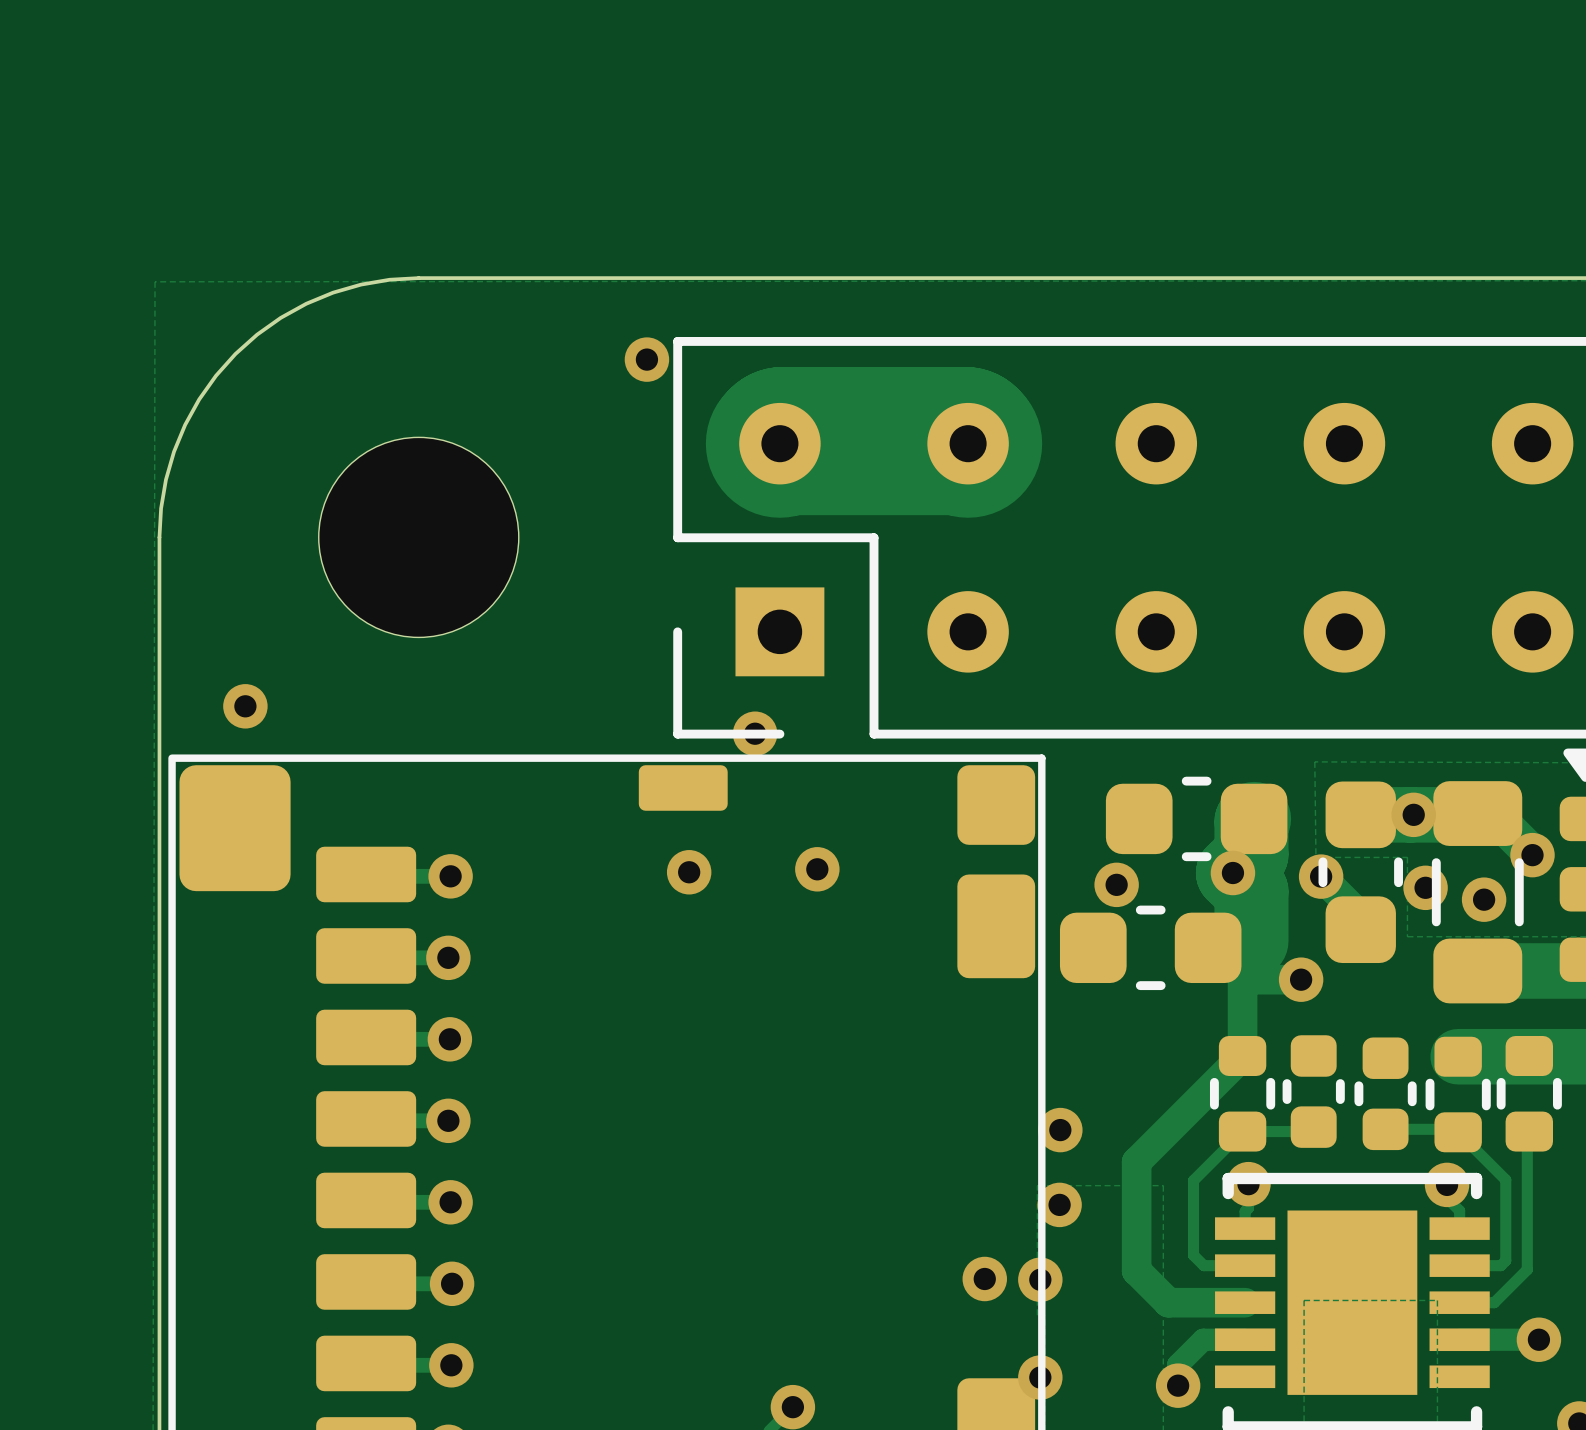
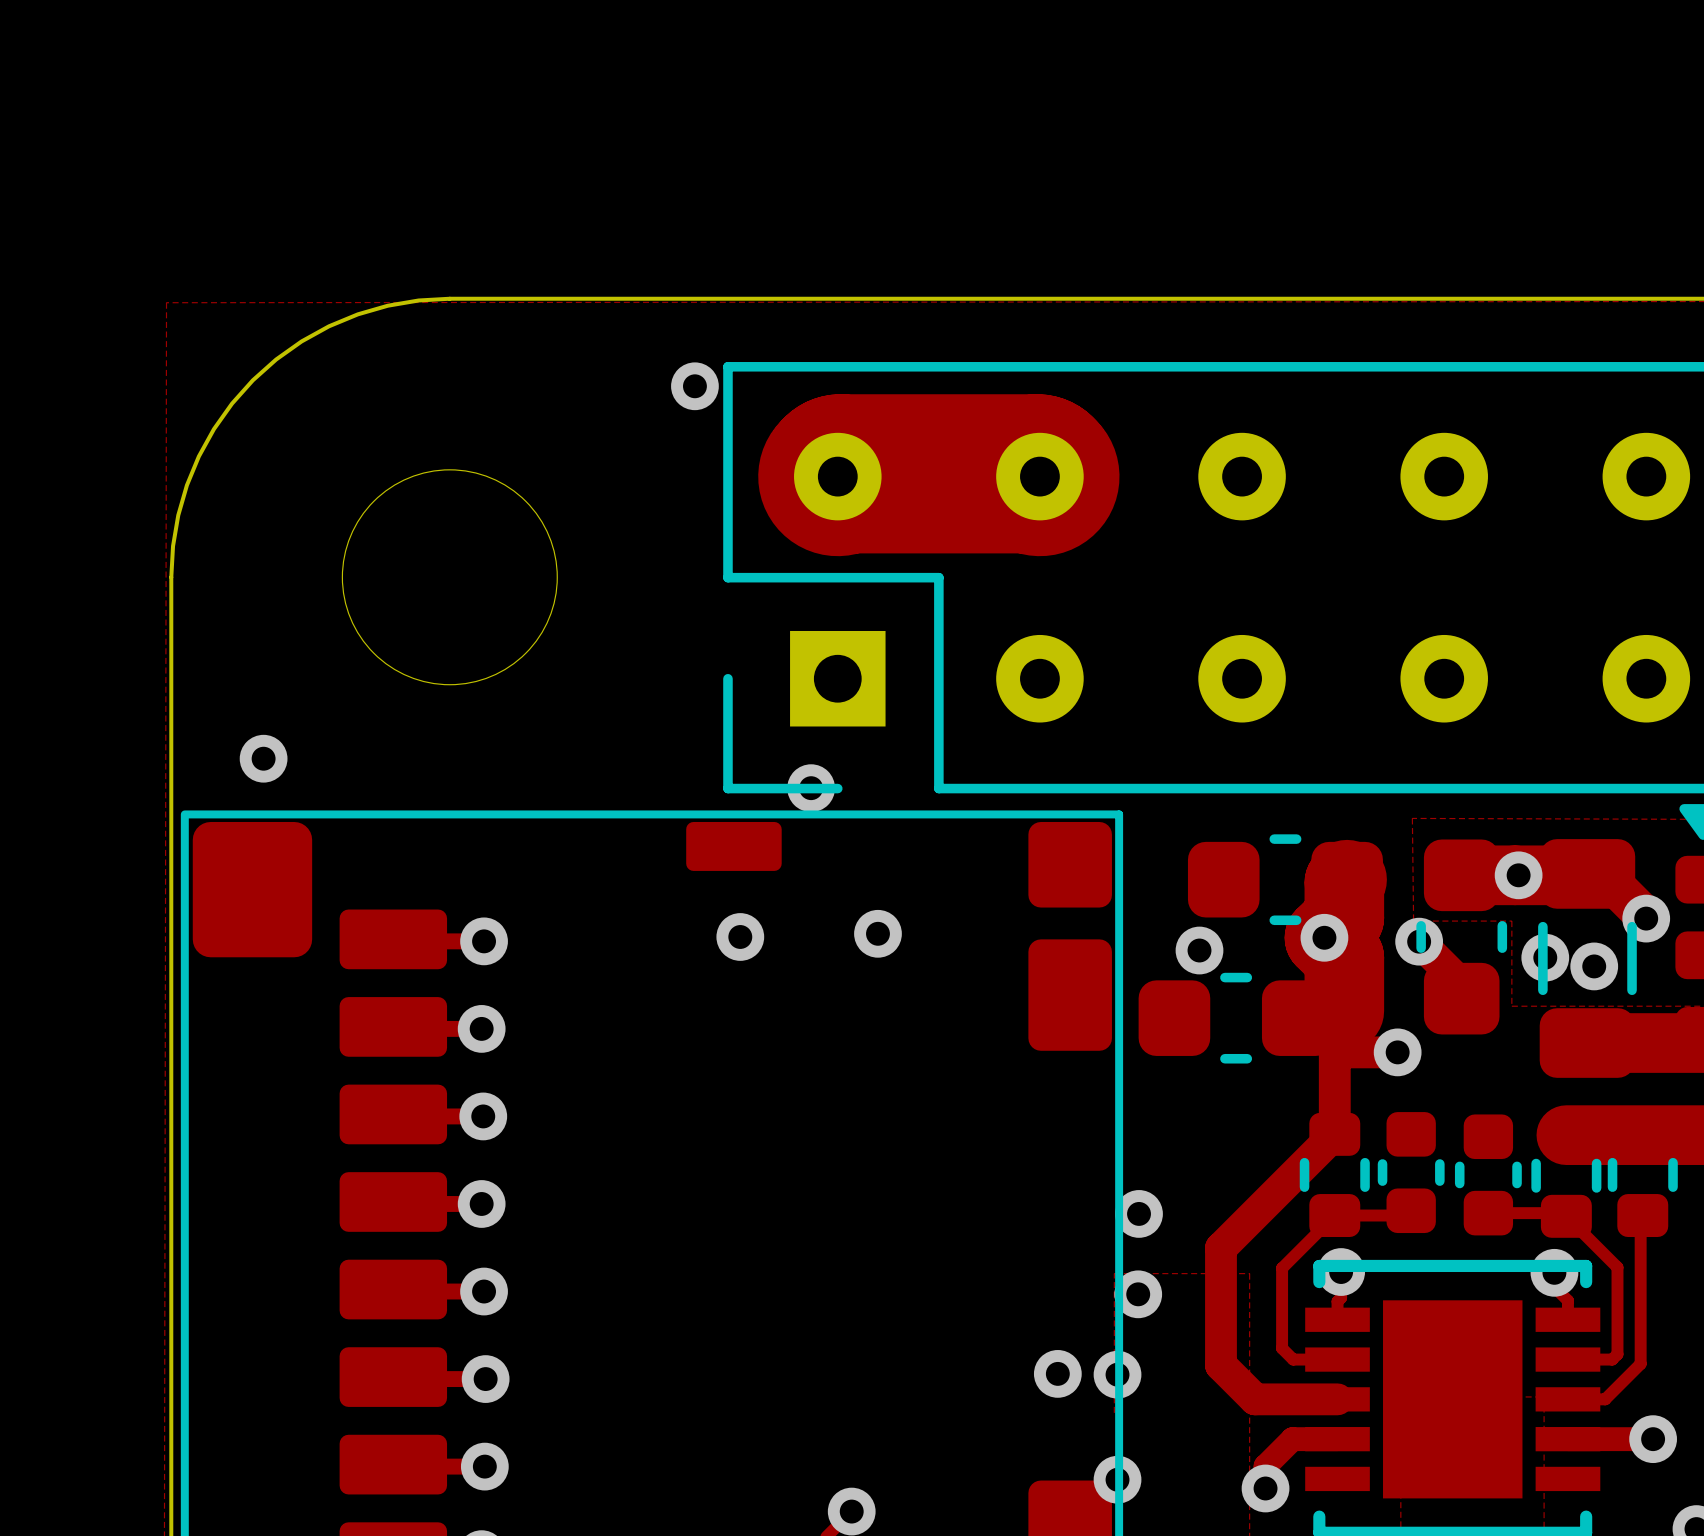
via position: (1425, 887) -> (1545, 957)

